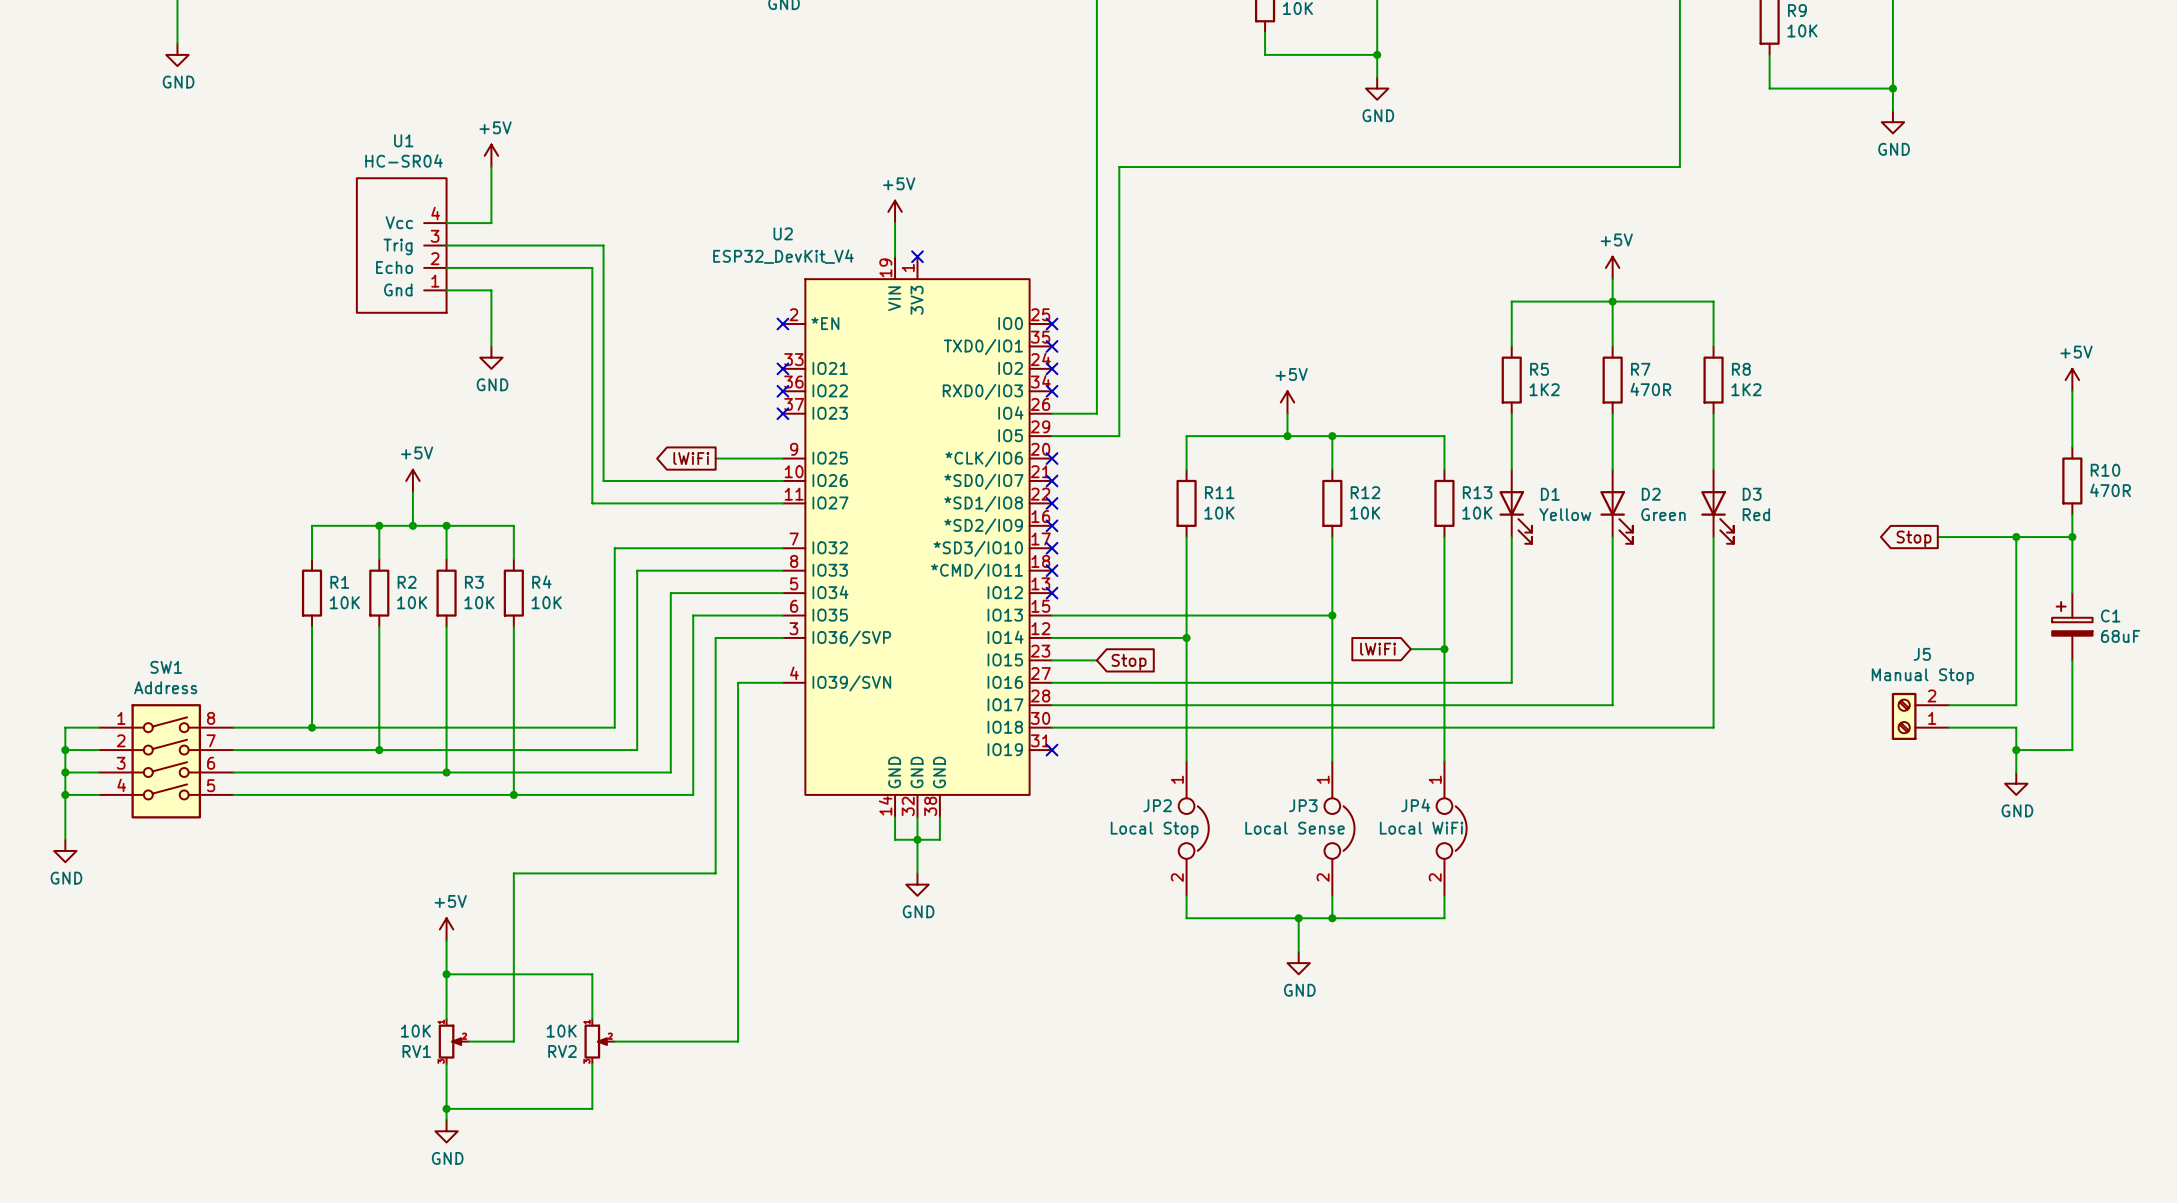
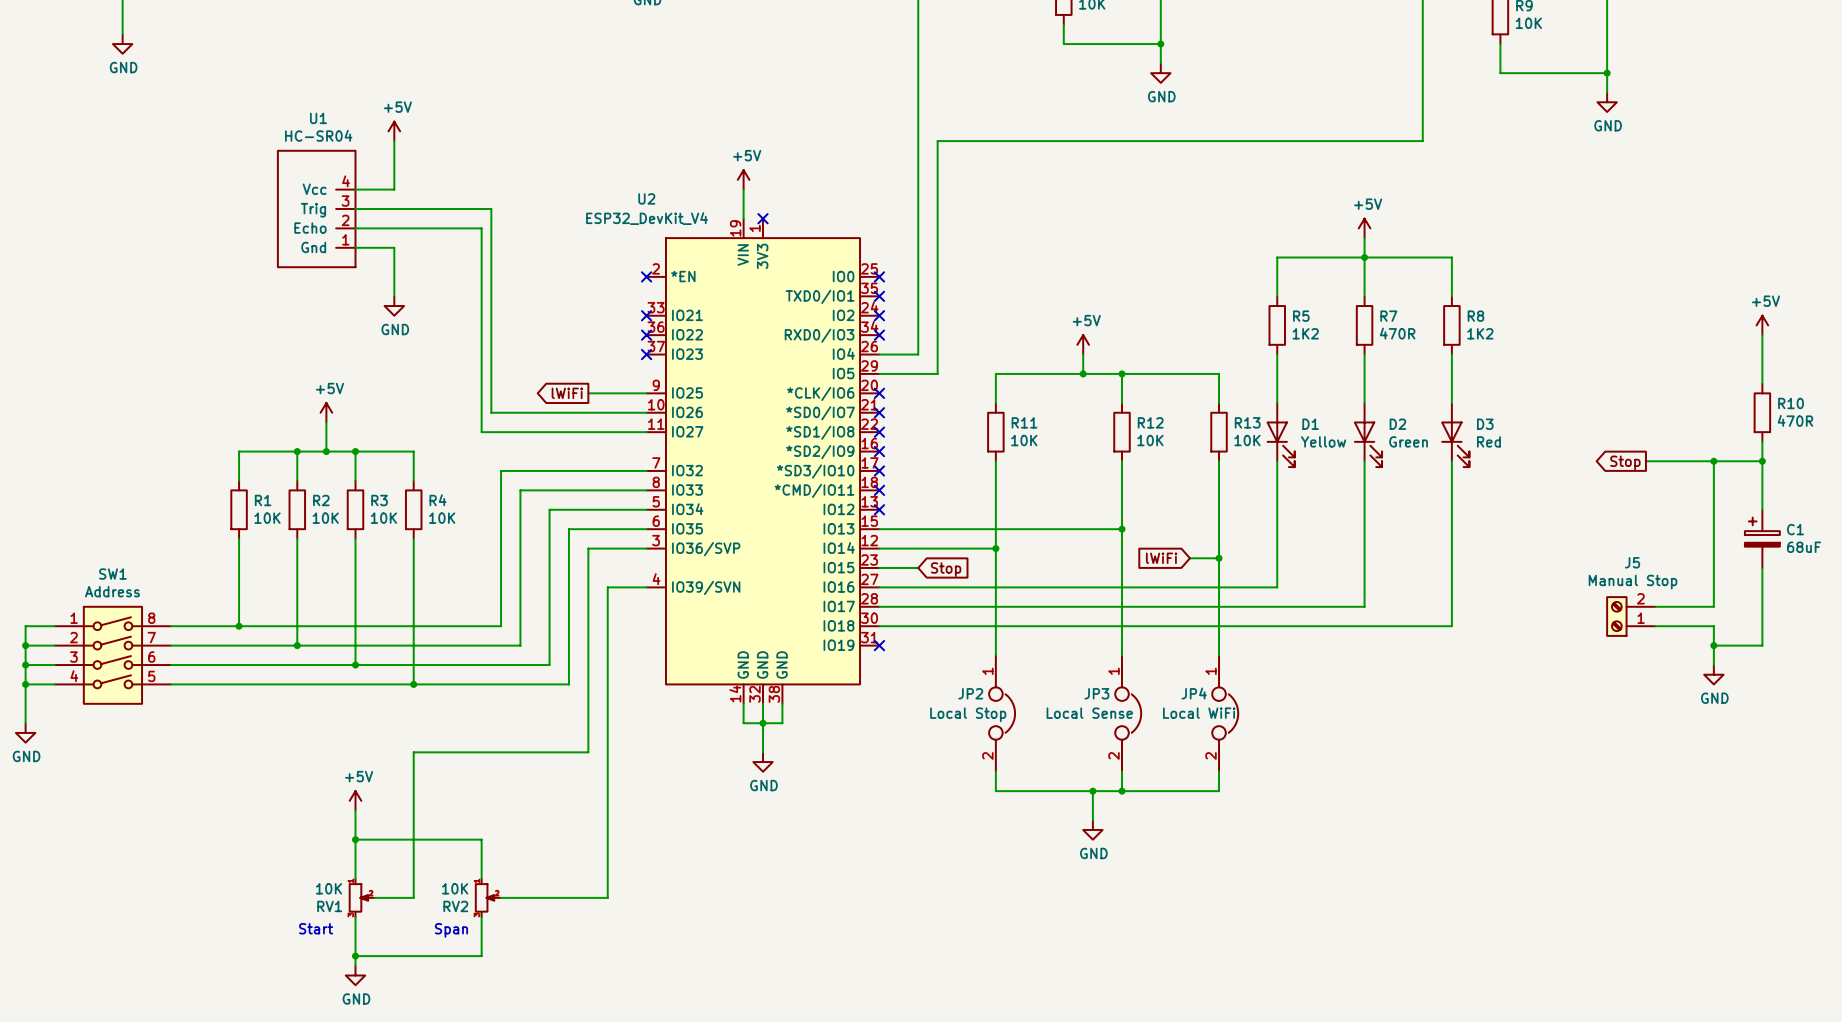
text: none -> Start (316, 928)
text: none -> Span (451, 930)

